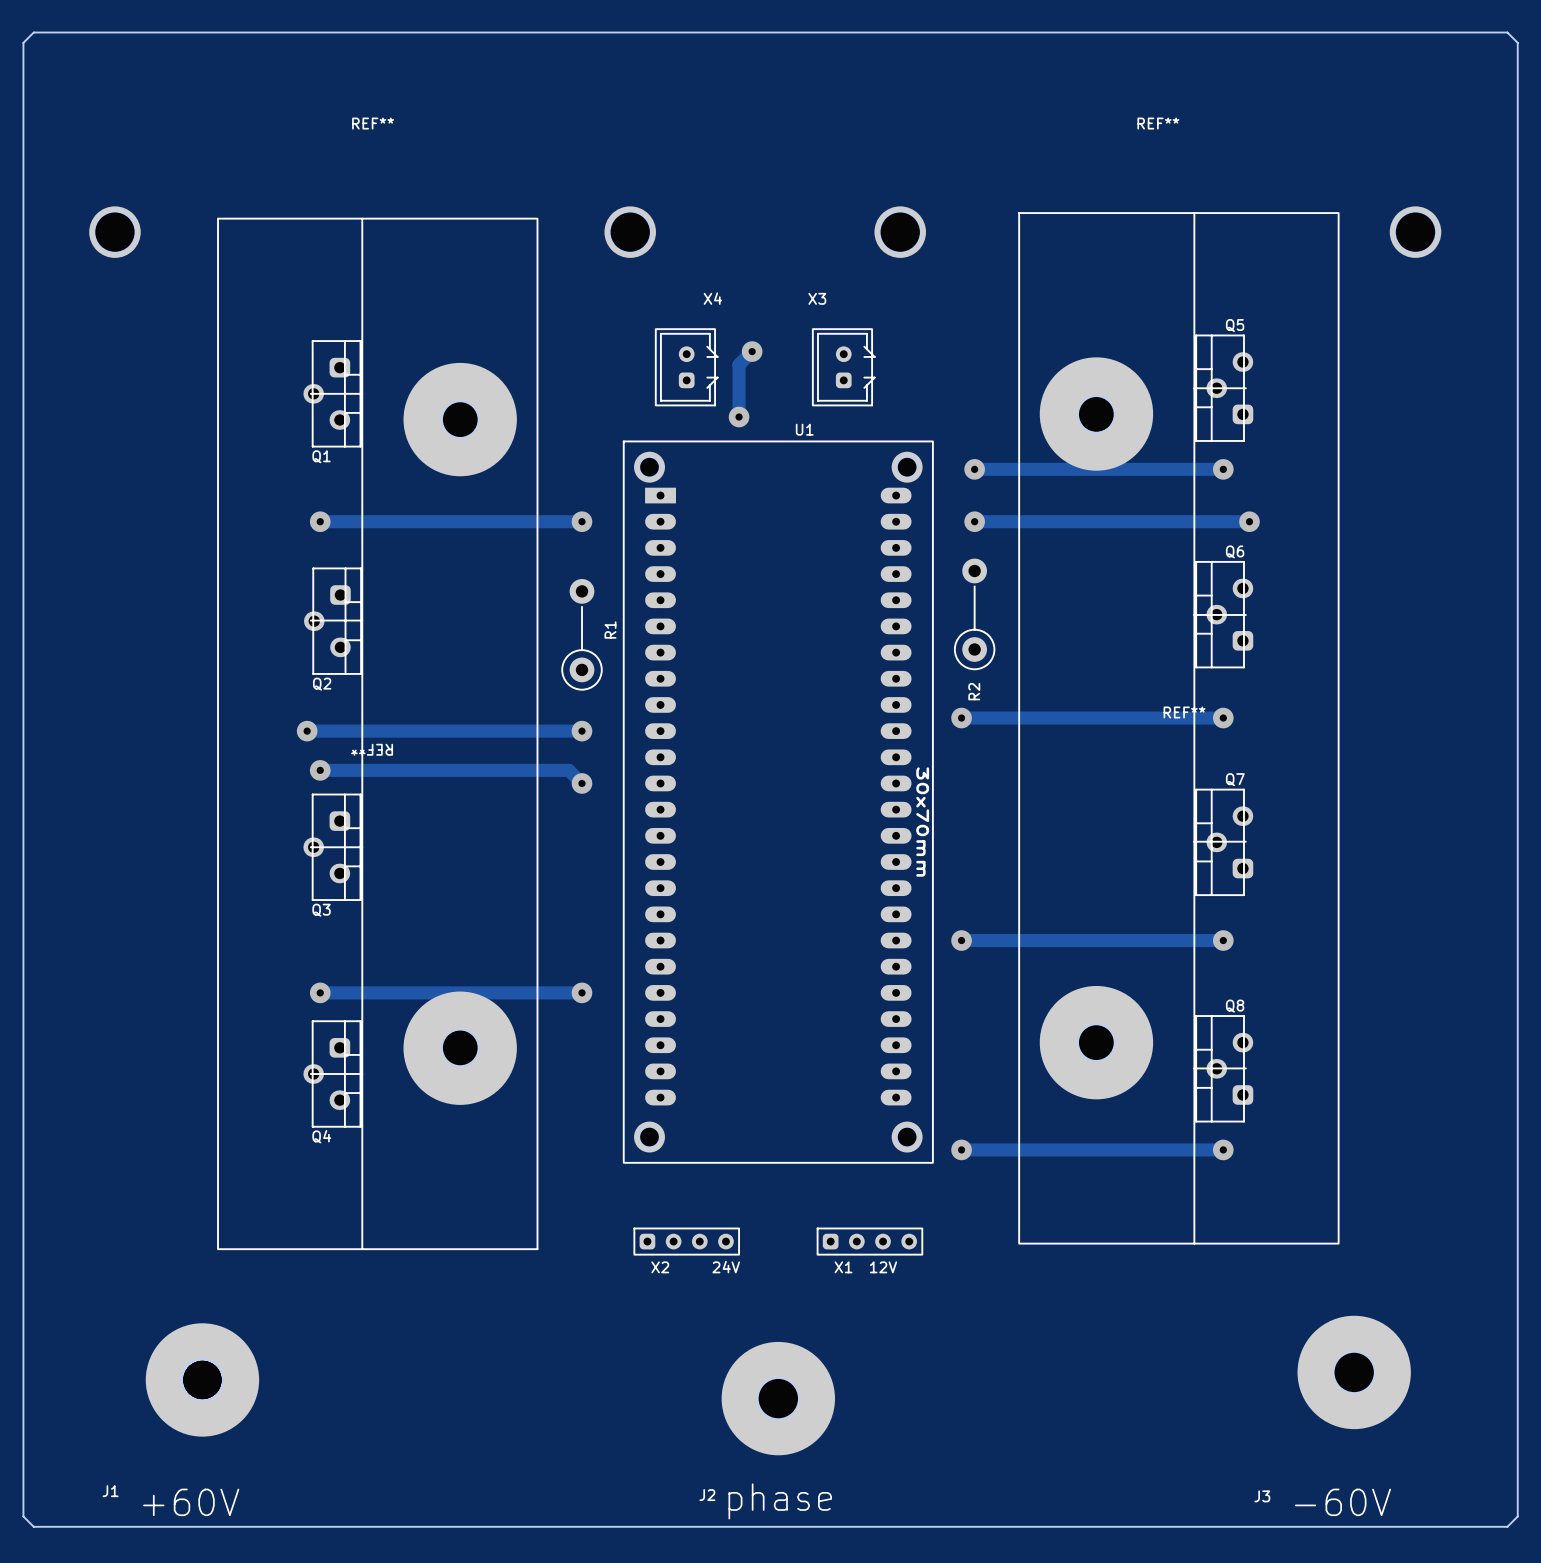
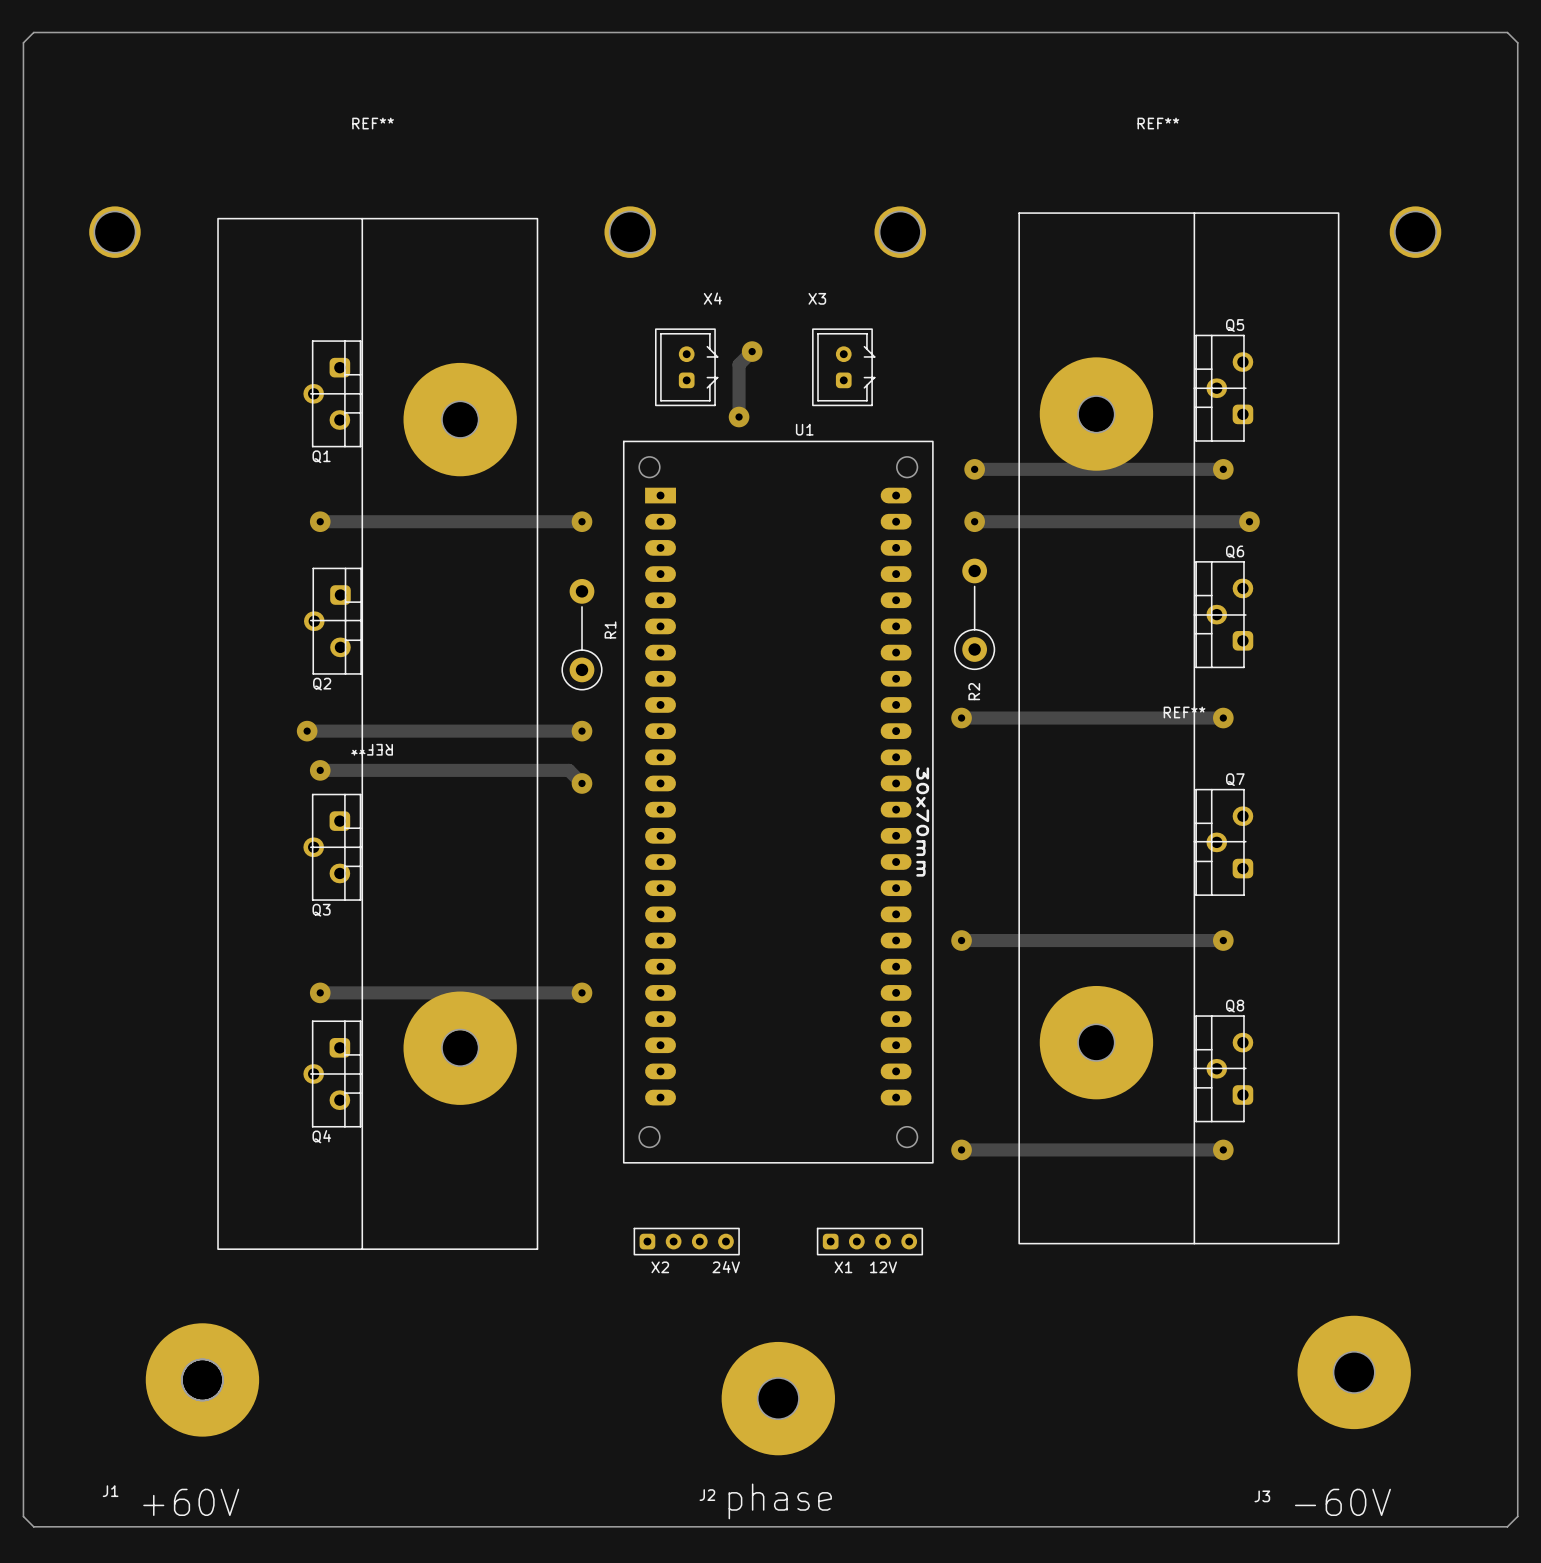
U1 footprint: [623, 440, 934, 1164] -> [623, 440, 934, 1164]

